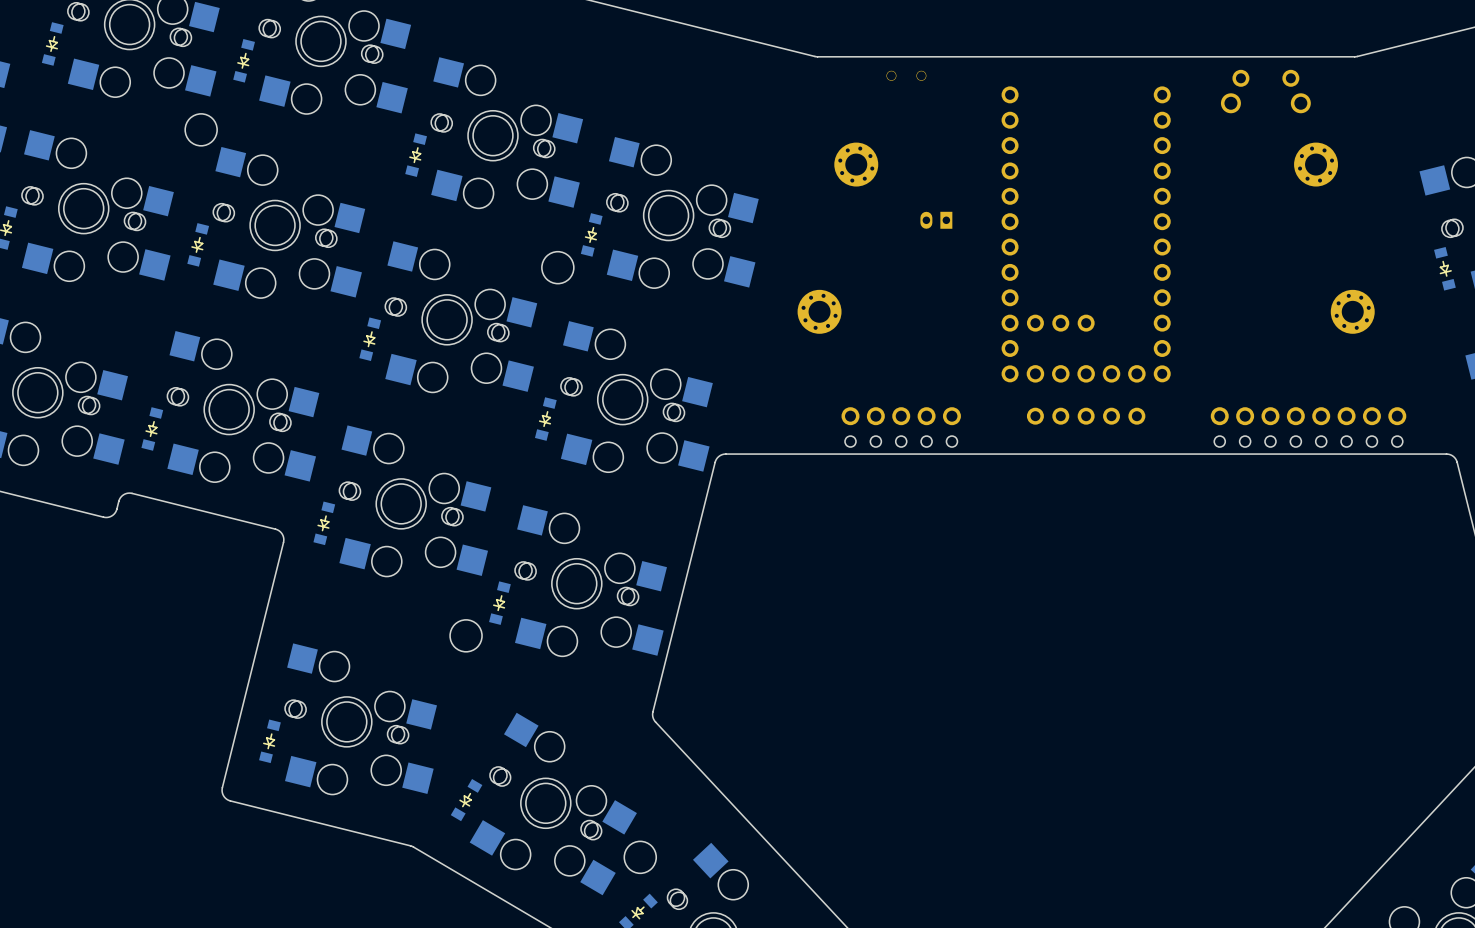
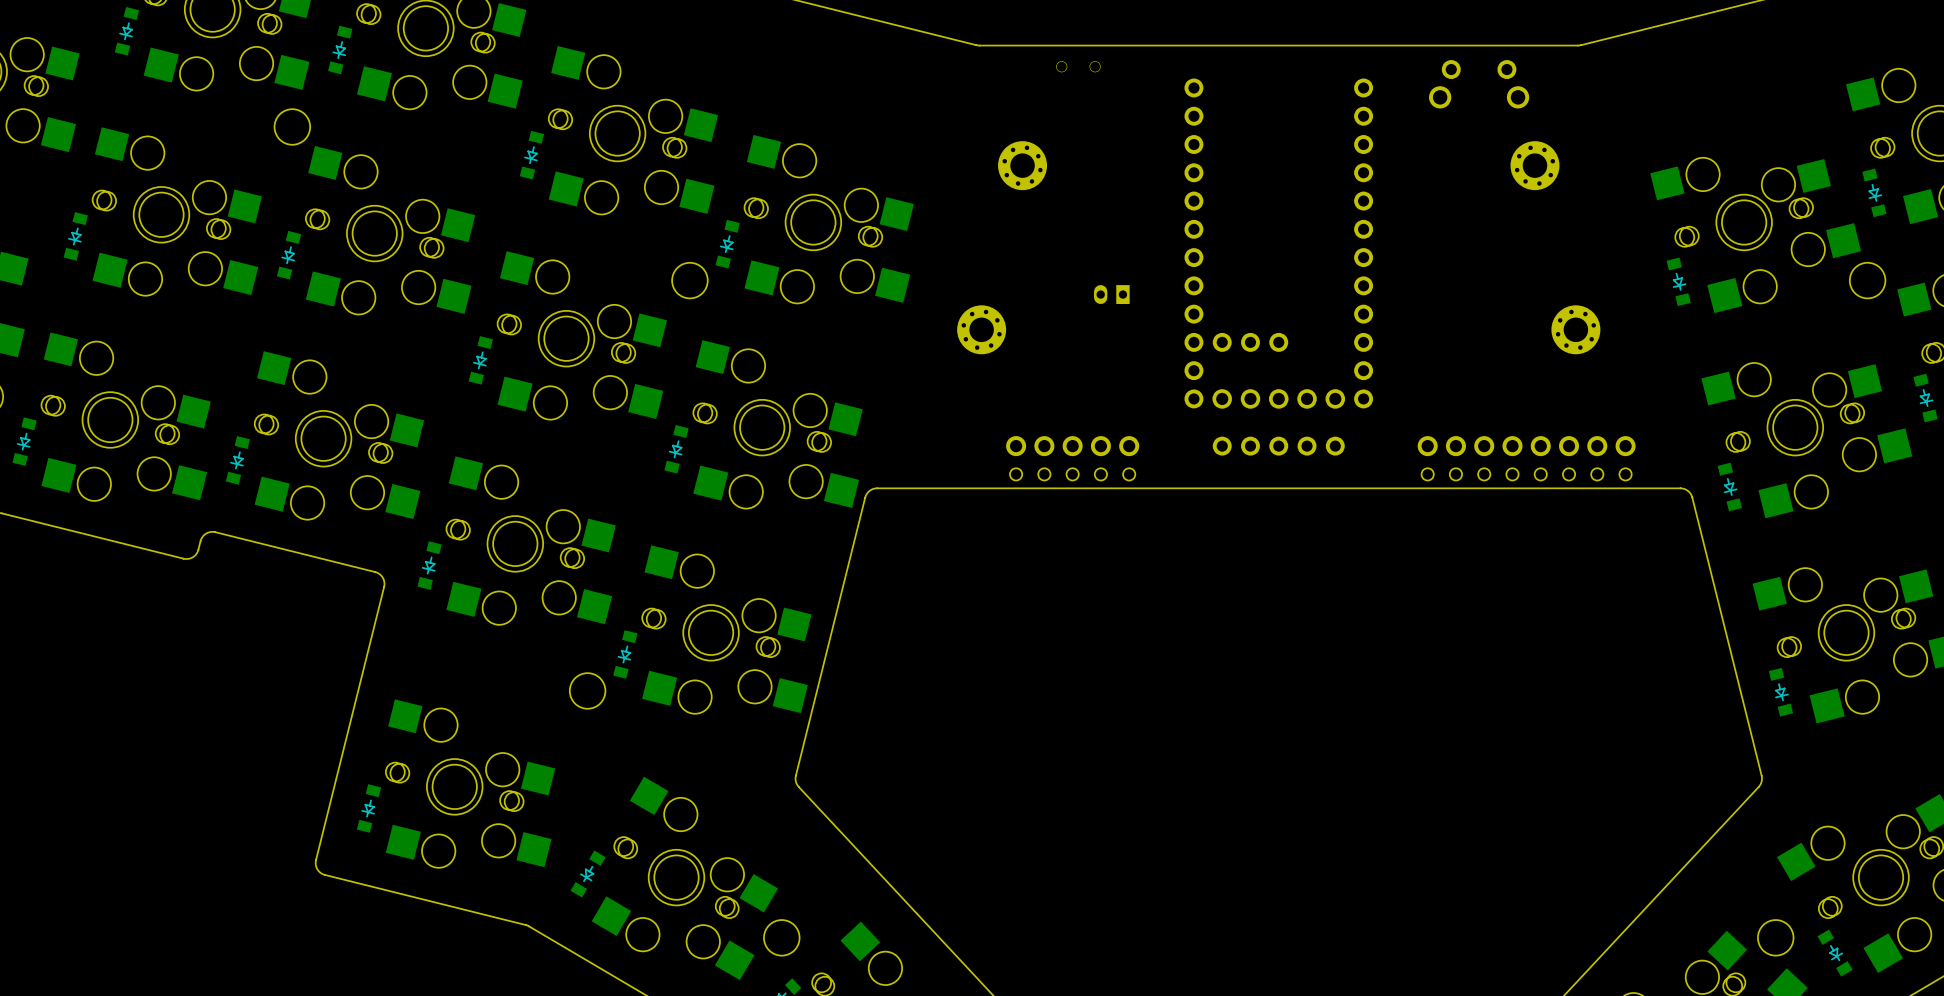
part position: (936, 220) -> (1111, 294)

